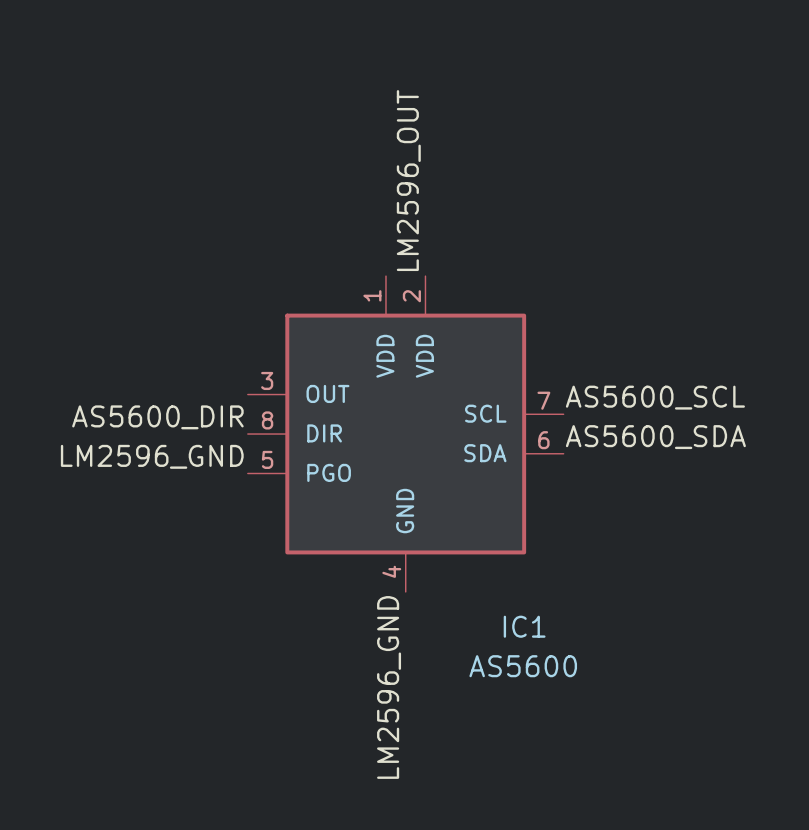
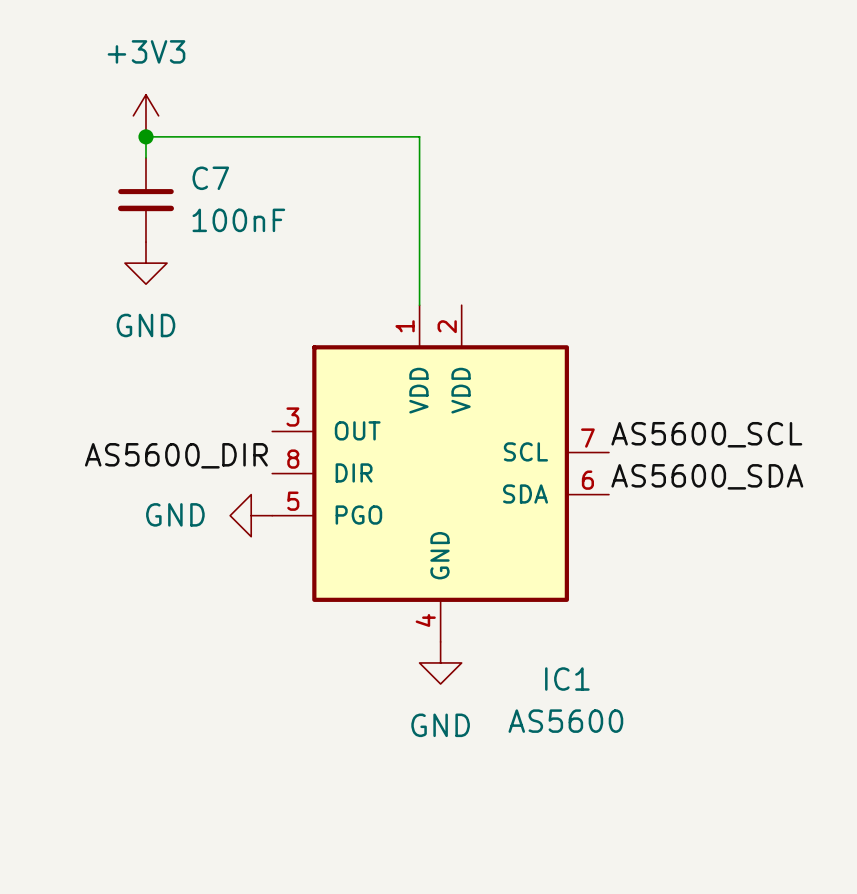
power symbol: none -> +3V3 (145, 115)
junction: none -> (145, 136)
wire: none -> (145, 157) (145, 136) (419, 136) (419, 305)
C7: none -> 100nF (145, 200)
label: LM2596_OUT (408, 180) -> none
power symbol: none -> GND (145, 263)
label: LM2596_GND (152, 456) -> none
power symbol: none -> GND (251, 515)
power symbol: none -> GND (440, 662)
label: LM2596_GND (389, 687) -> none

